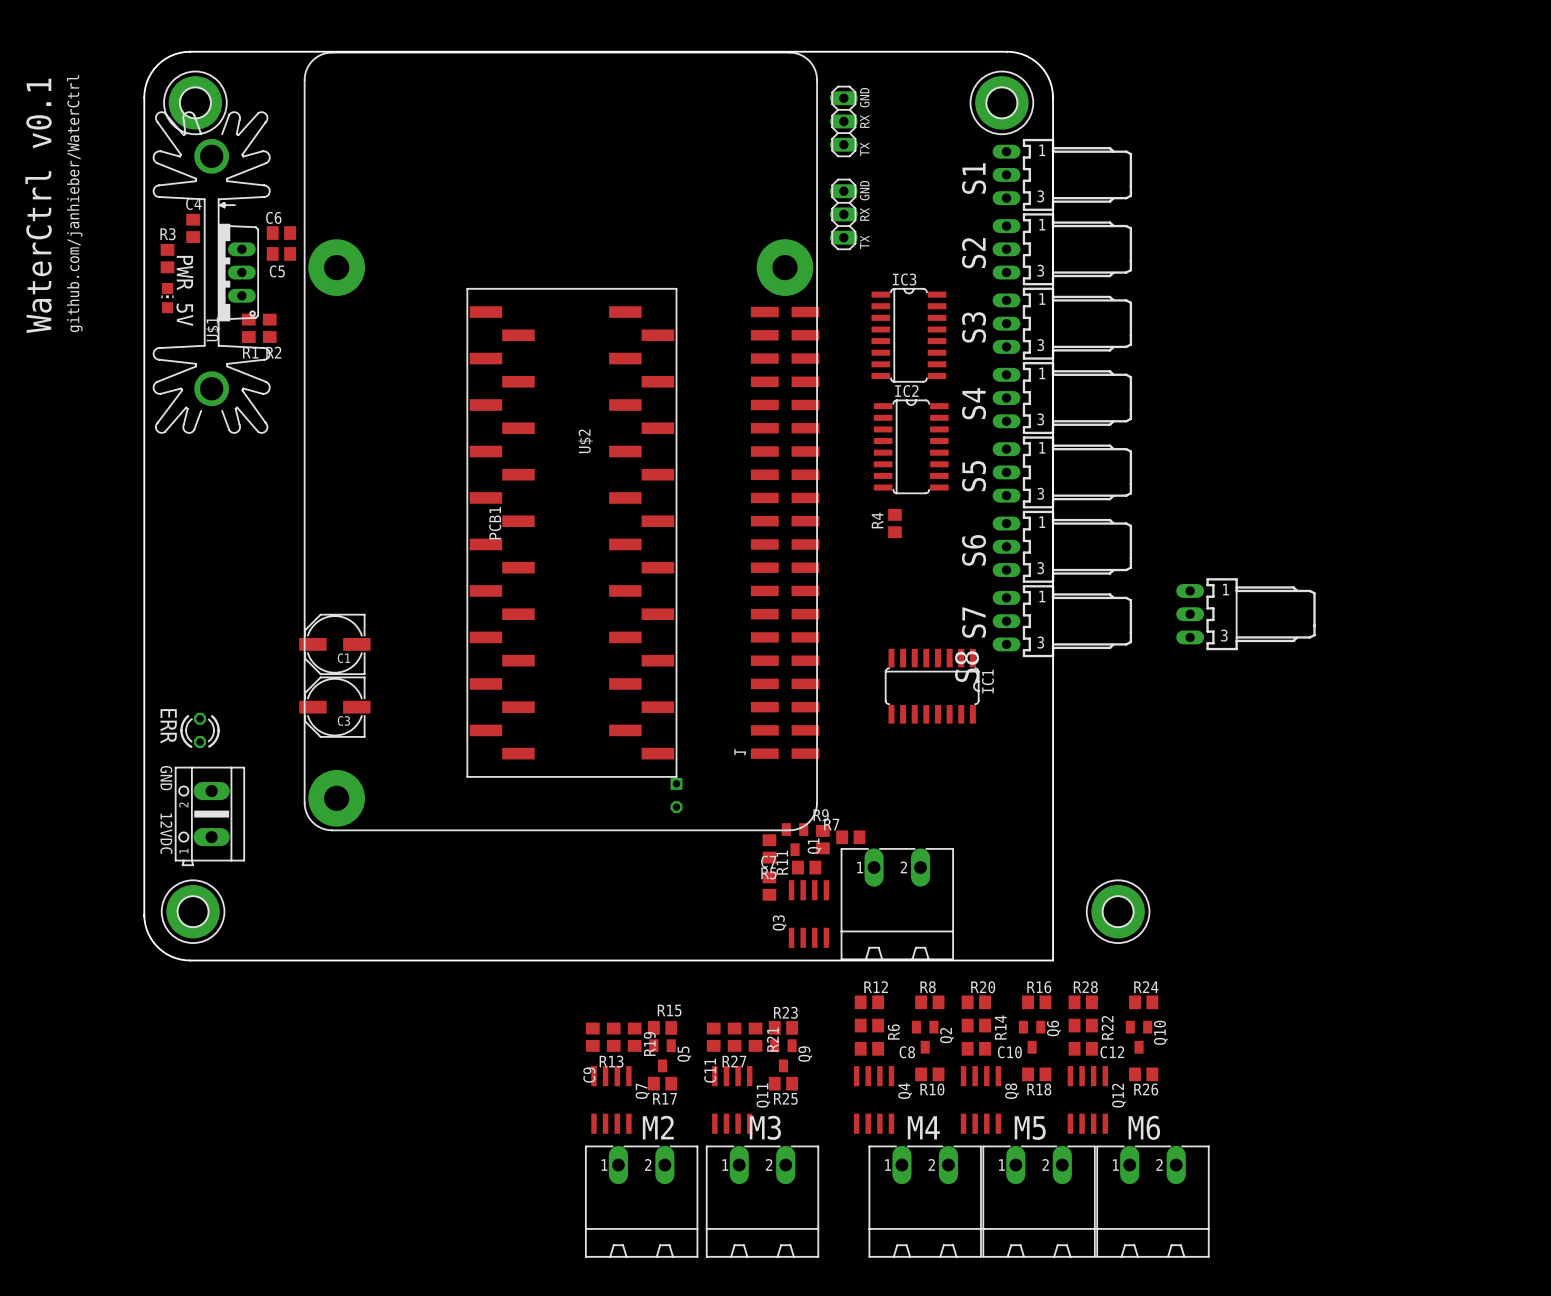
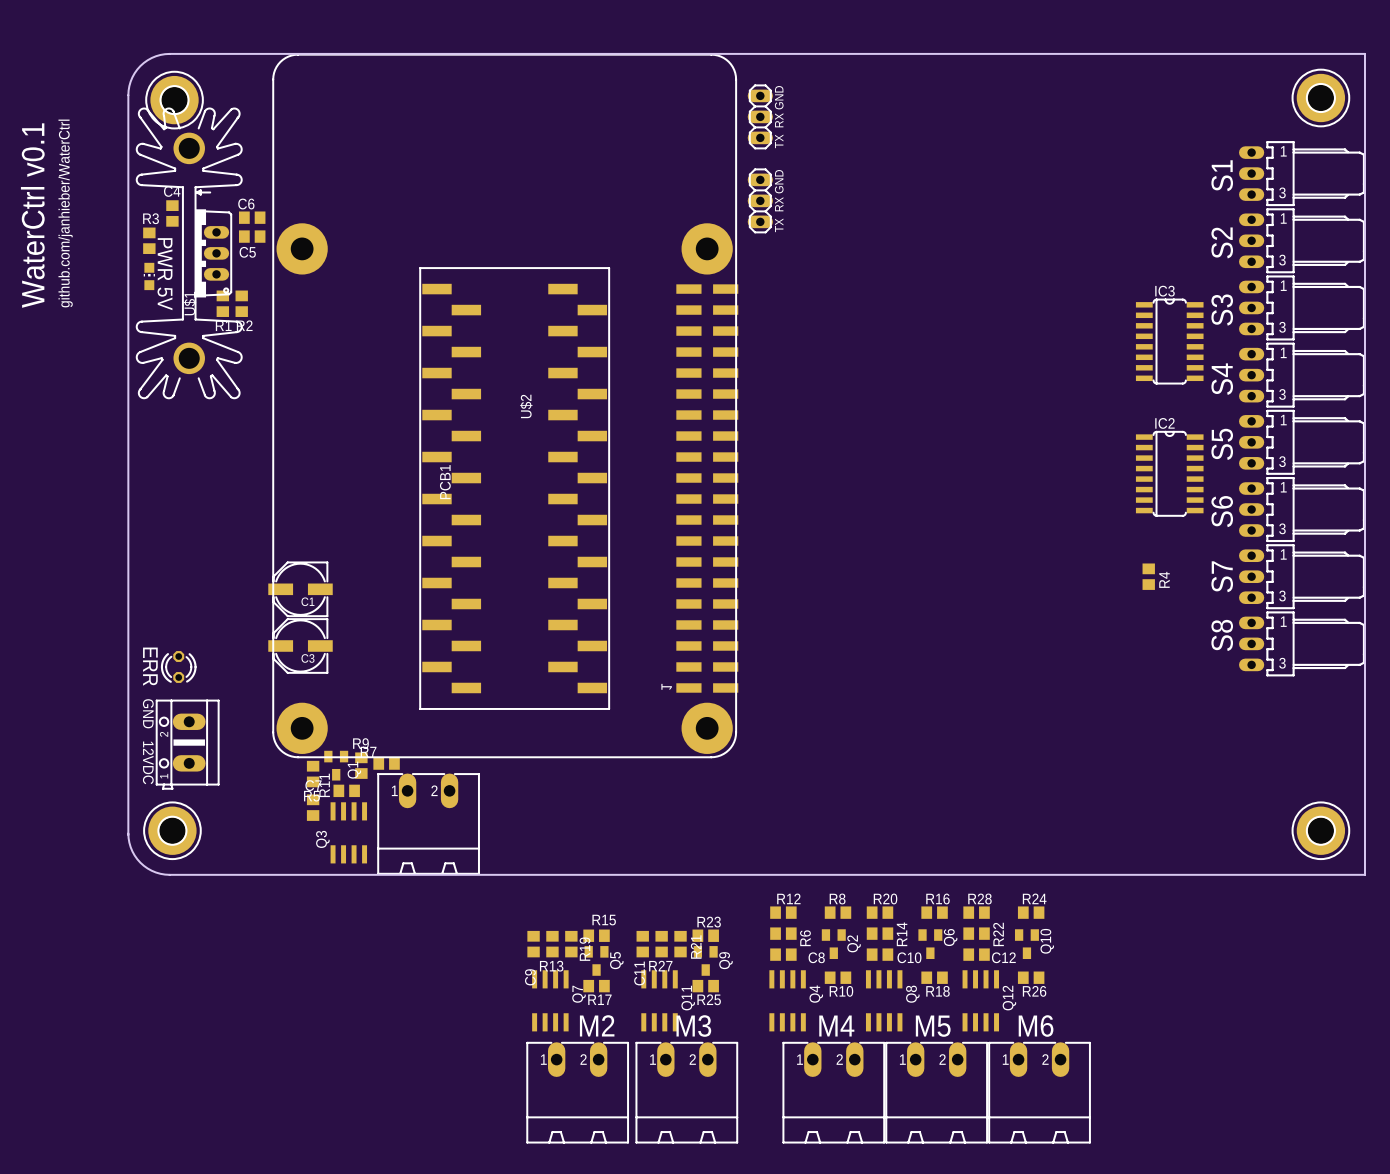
PCB1 footprint: [304, 51, 820, 831] -> [272, 54, 739, 758]
board edge: (1007, 51) (1022, 54) (1039, 65) (1050, 82) (1053, 97) (1053, 960) -> (907, 53) (1364, 53) (1364, 874) (949, 874)
part: none -> (1320, 98)
part: (1001, 102) -> none
part: (1062, 174) -> none
text: S1 (974, 178) -> none
part: none -> (1302, 173)
text: none -> S1 (1222, 175)
part: (1062, 249) -> none
text: S2 (974, 253) -> none
part: none -> (1302, 240)
text: none -> S2 (1222, 242)
part: (1062, 323) -> none
text: S3 (974, 327) -> none
part: none -> (1302, 307)
IC3 position: (908, 335) -> (1169, 341)
text: none -> S3 (1222, 310)
part: (1062, 398) -> none
text: S4 (974, 403) -> none
part: none -> (1302, 375)
text: none -> S4 (1222, 379)
IC2 position: (911, 446) -> (1169, 473)
part: (1062, 472) -> none
text: S5 (974, 476) -> none
part: none -> (1302, 442)
text: none -> S5 (1222, 444)
R4 name position: R4 (877, 520) -> R4 (1164, 579)
R4 position: (894, 523) -> (1148, 576)
part: (1062, 546) -> none
text: S6 (974, 550) -> none
part: none -> (1302, 509)
text: none -> S6 (1222, 511)
part: (1245, 614) -> none
part: (1062, 621) -> none
text: S7 (974, 622) -> none
part: none -> (1302, 576)
text: none -> S7 (1222, 576)
text: S8 (967, 666) -> none
IC1: (932, 686) -> none
text: none -> S8 (1222, 635)
part: none -> (1302, 643)
R7 position: (850, 837) -> (386, 763)
Q1 position: (795, 839) -> (336, 765)
R9 position: (822, 839) -> (361, 765)
R5 position: (769, 848) -> (313, 774)
R11 position: (806, 867) -> (346, 790)
C7 position: (769, 886) -> (313, 807)
part: none -> (428, 823)
part: (897, 904) -> none
part: (1118, 911) -> none
part: none -> (1320, 830)
Q3 position: (808, 914) -> (348, 832)

